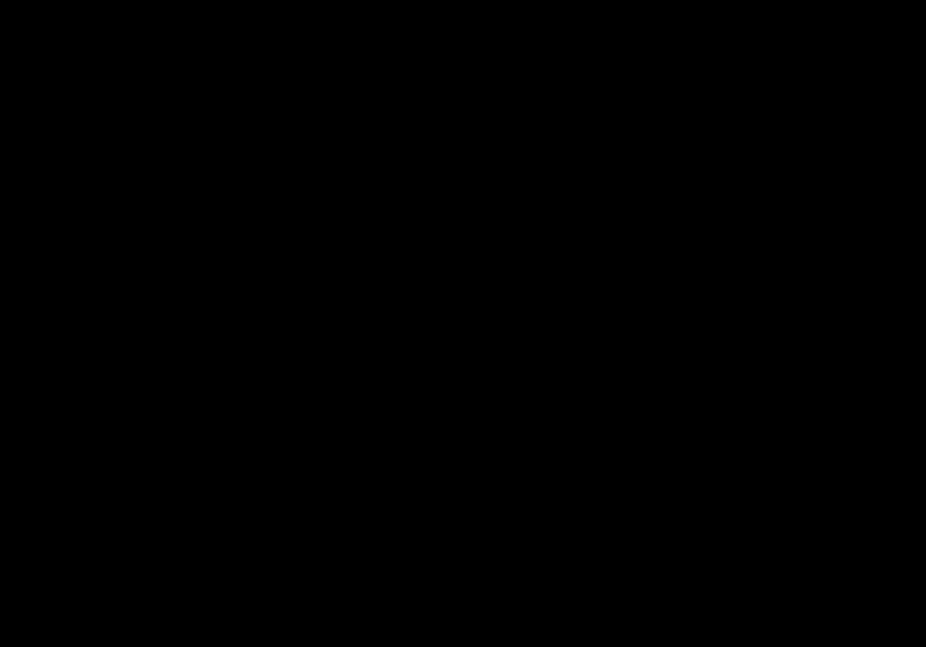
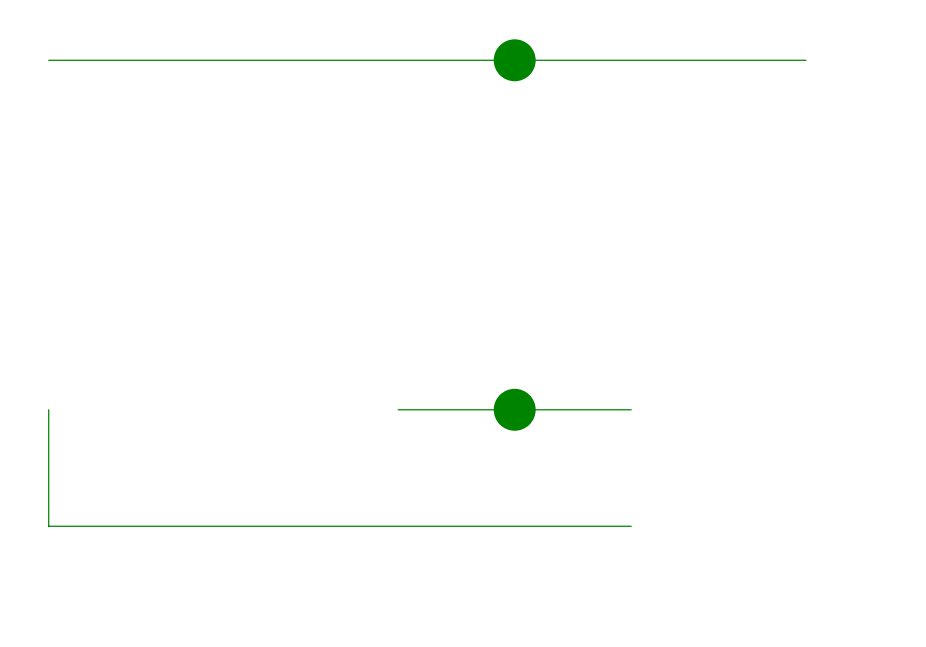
wire: none -> (48, 60) (805, 60)
junction: none -> (514, 60)
wire: none -> (48, 409) (48, 526) (631, 526)
wire: none -> (398, 409) (631, 409)
junction: none -> (514, 409)

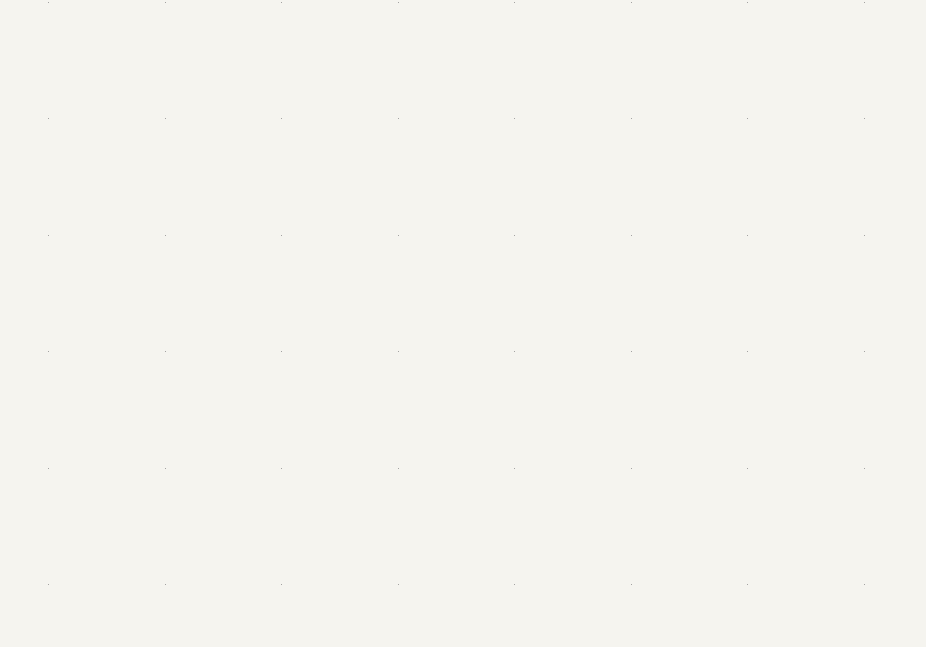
wire: (48, 60) (805, 60) -> none
junction: (514, 60) -> none
wire: (48, 409) (48, 526) (631, 526) -> none
wire: (398, 409) (631, 409) -> none
junction: (514, 409) -> none

